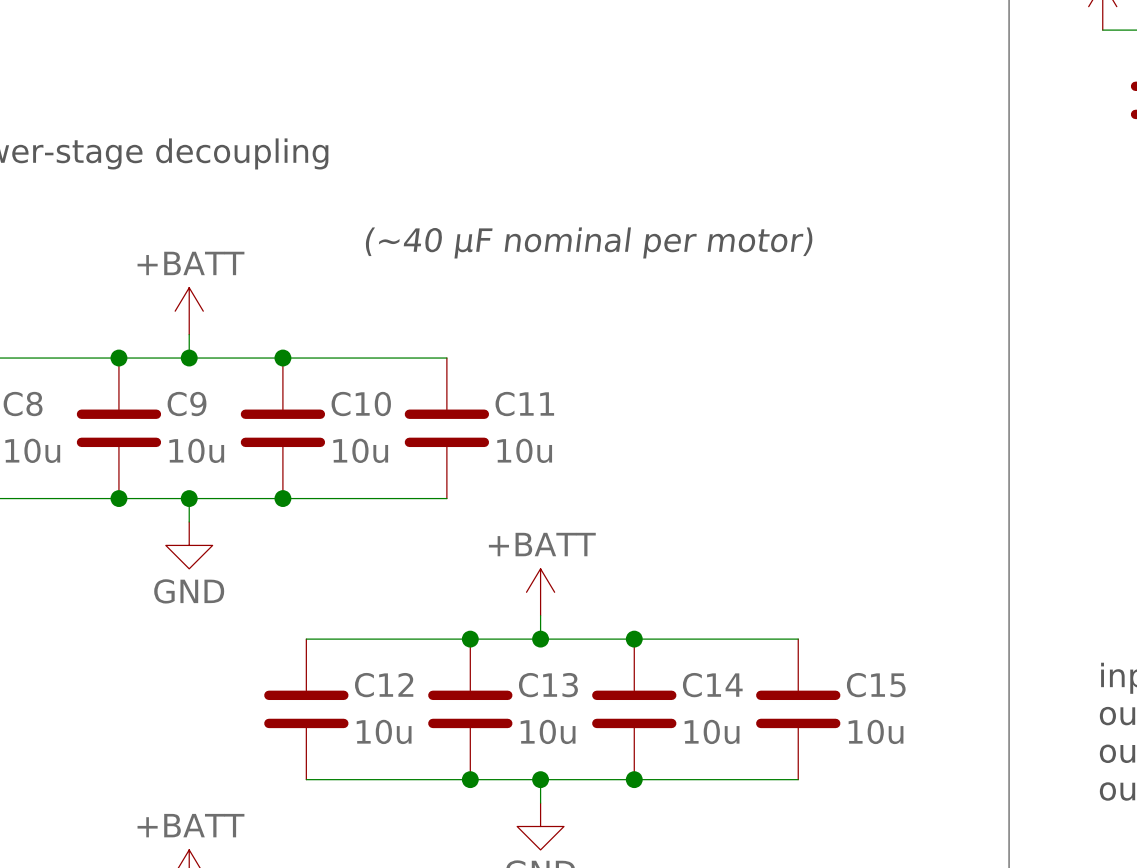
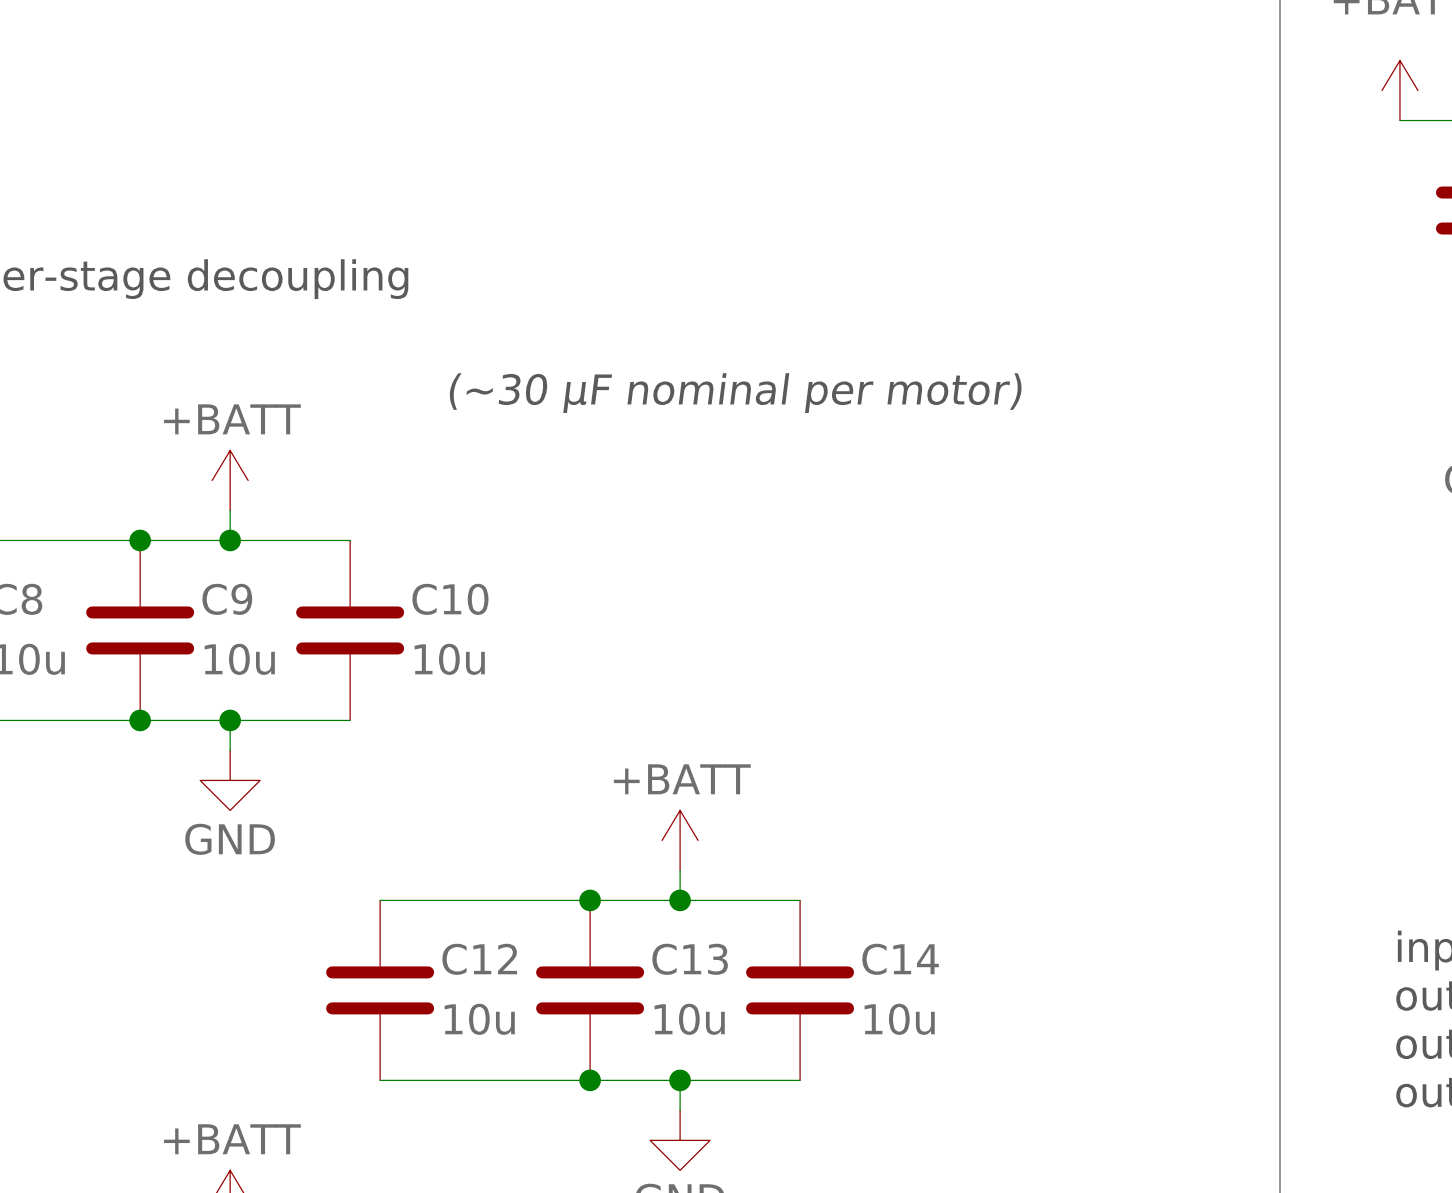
text: (~40 µF nominal per motor) (589, 242) -> (~30 µF nominal per motor) (735, 393)
wire: (282, 358) (446, 358) -> none
junction: (282, 358) -> none
C11: 10u (446, 428) -> none
wire: (282, 498) (446, 498) -> none
junction: (282, 498) -> none
wire: (634, 639) (798, 639) -> none
junction: (634, 639) -> none
C15: 10u (798, 709) -> none
wire: (634, 779) (798, 779) -> none
junction: (634, 779) -> none

